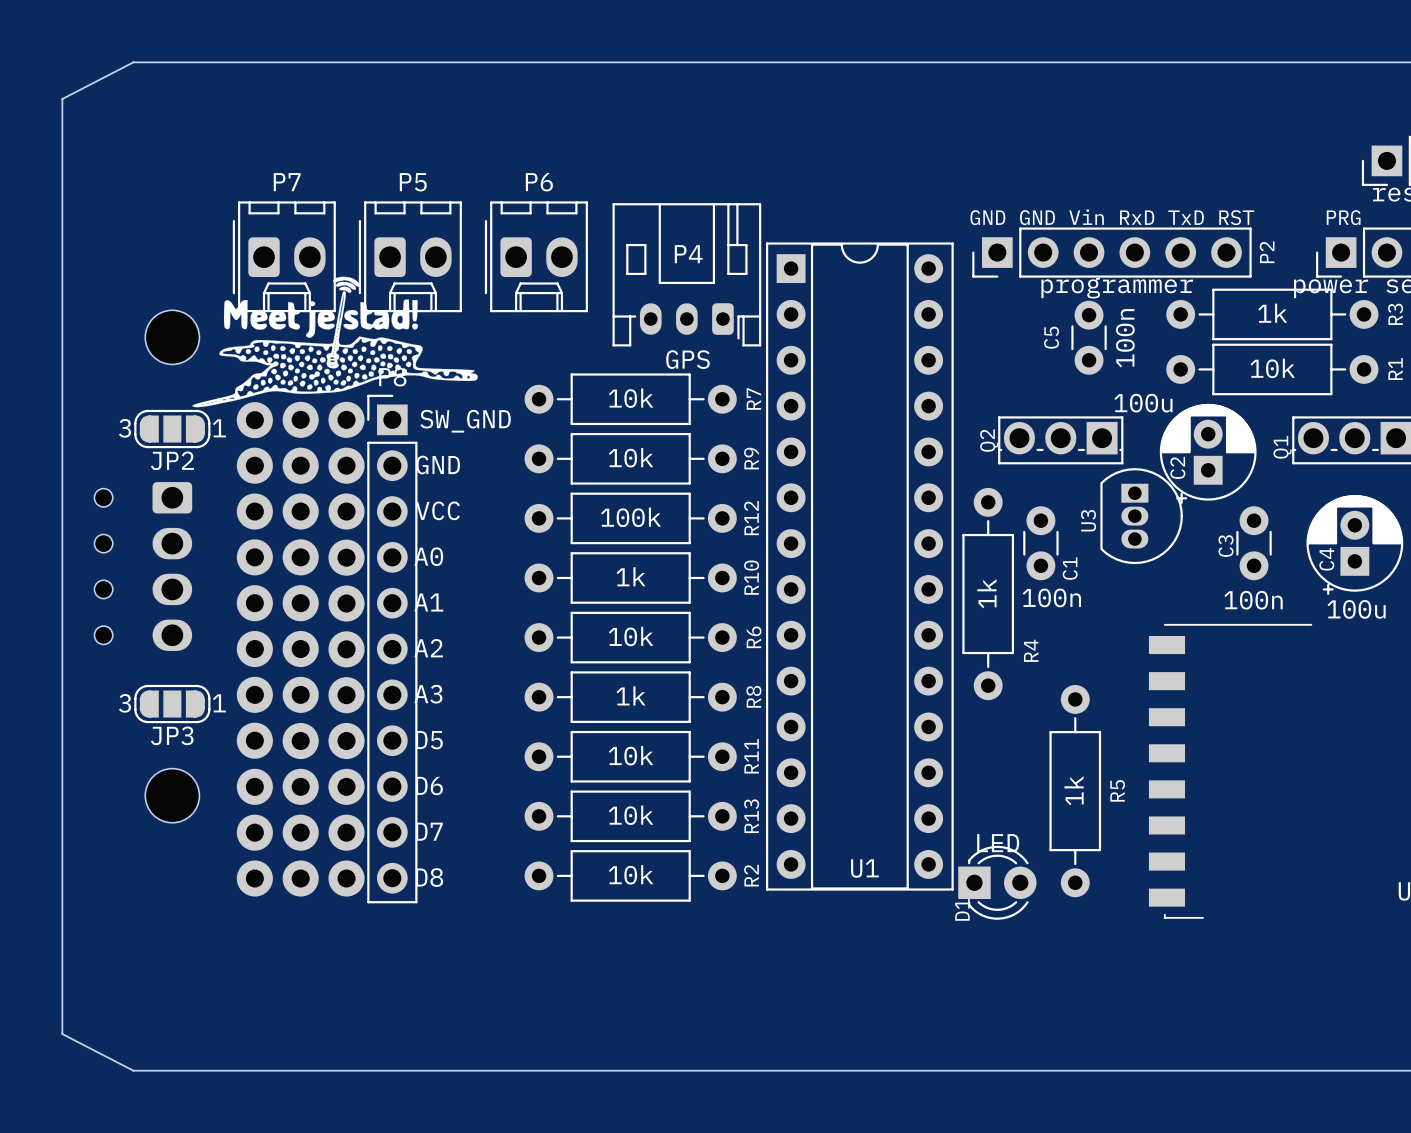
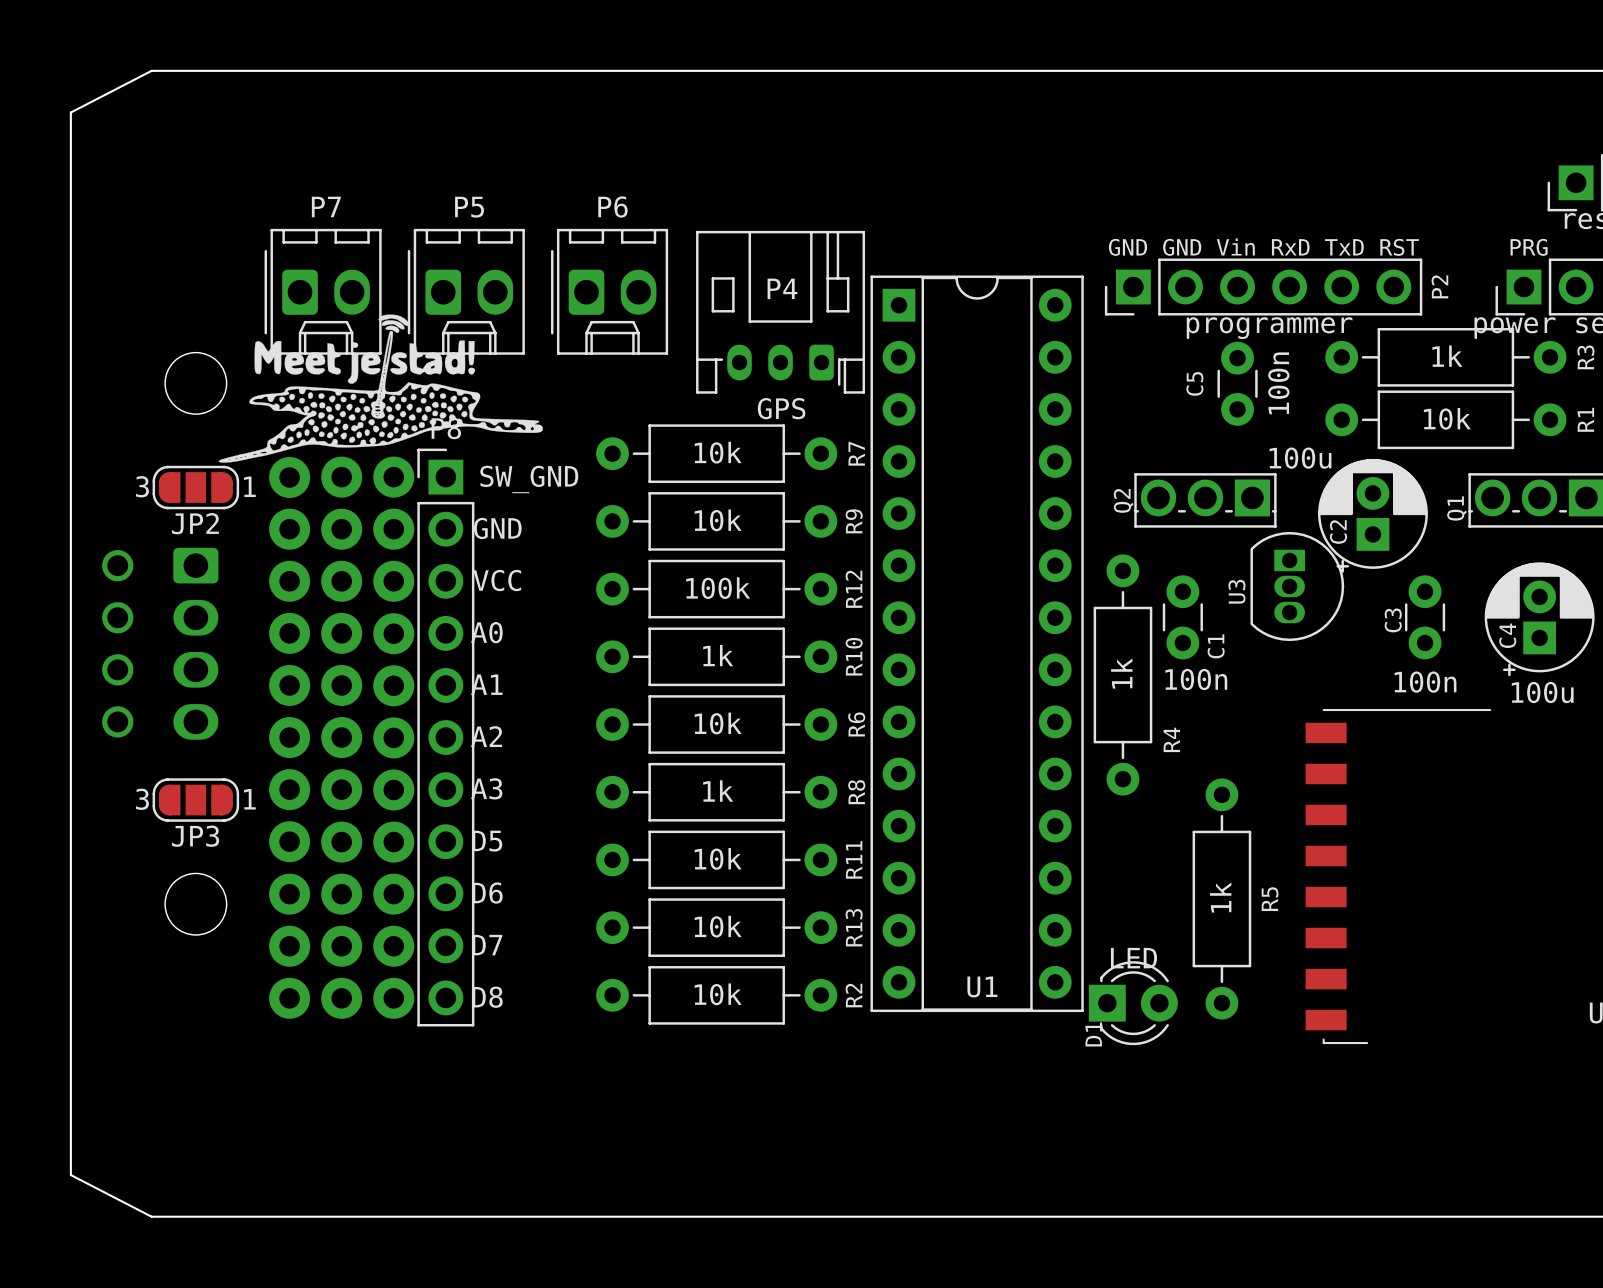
part footprint: [94, 482, 193, 651] -> [102, 547, 219, 740]

